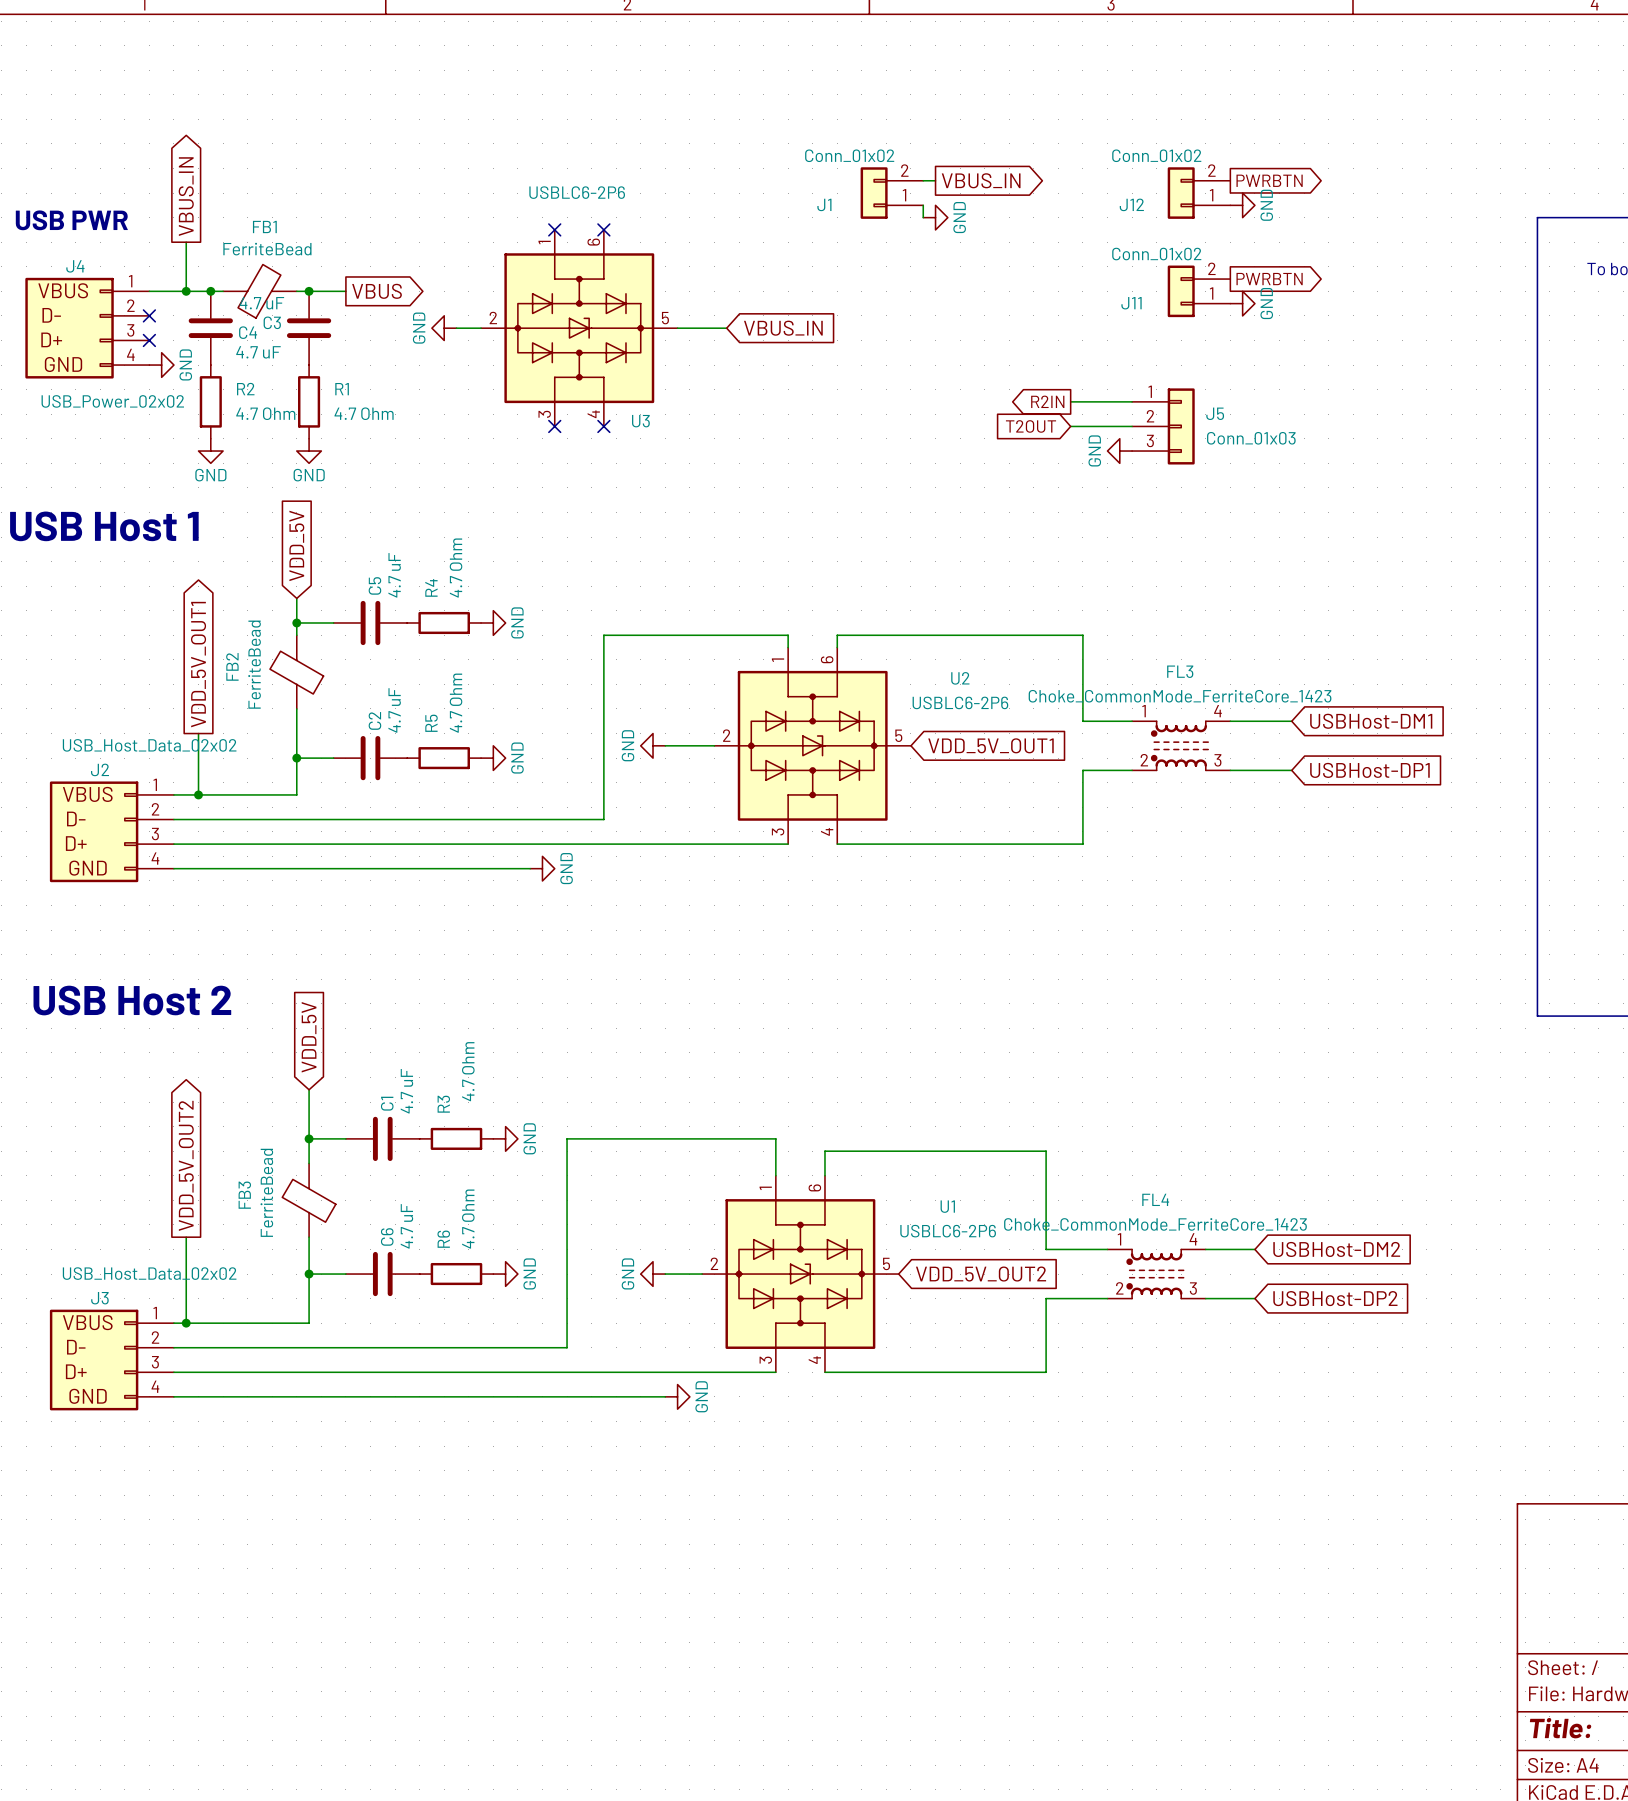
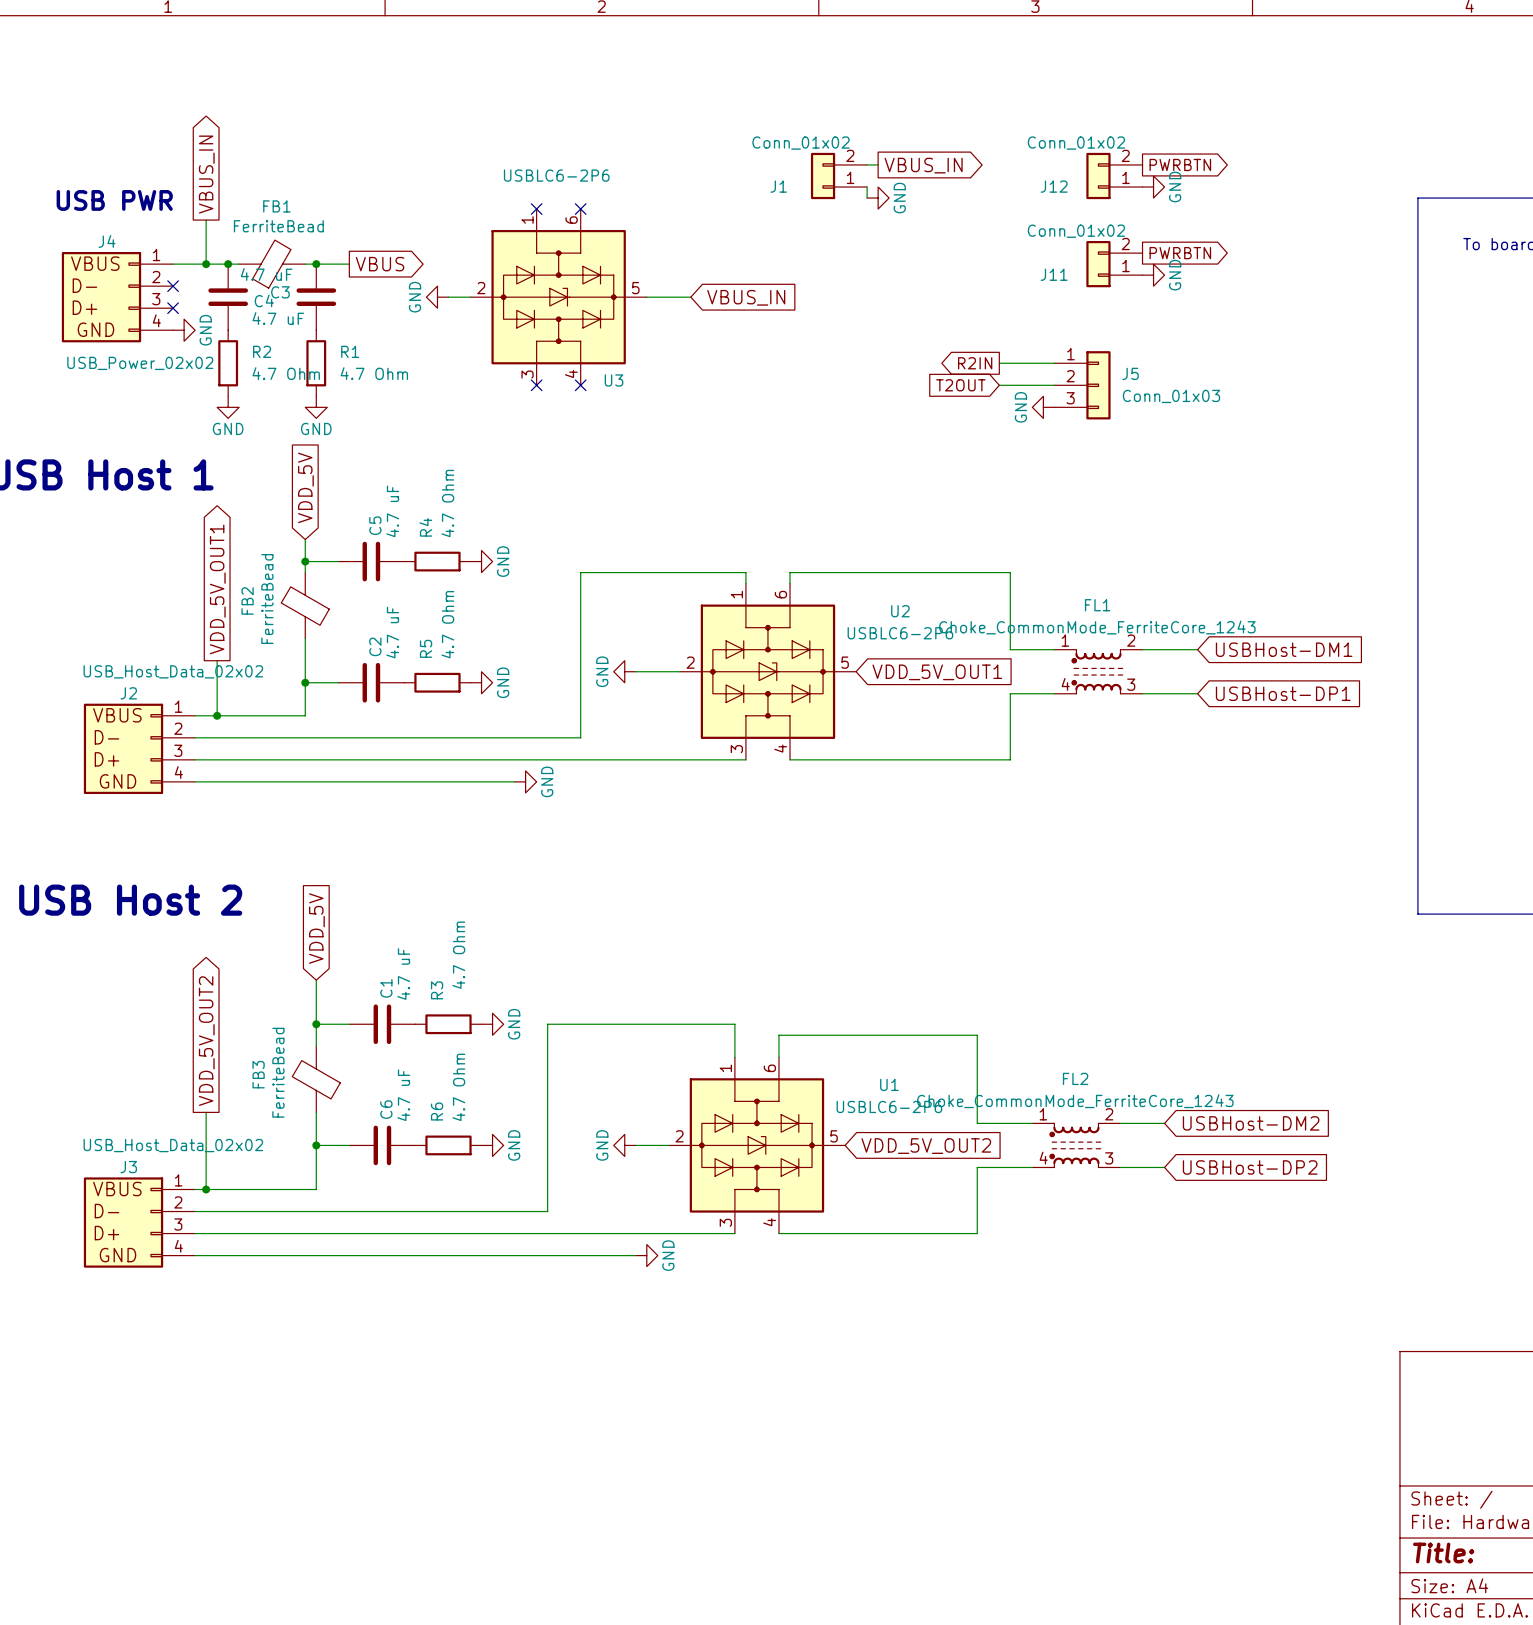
FL3 name: FL3 (1180, 671) -> FL1 (1097, 605)
FL3 value: Choke_CommonMode_FerriteCore_1423 (1180, 696) -> Choke_CommonMode_FerriteCore_1243 (1097, 627)
FL3 pin number: 4 (1217, 711) -> 2 (1131, 640)
FL3 pin number: 2 (1144, 760) -> 4 (1065, 684)
FL4 name: FL4 (1155, 1199) -> FL2 (1075, 1078)
FL4 value: Choke_CommonMode_FerriteCore_1423 (1155, 1224) -> Choke_CommonMode_FerriteCore_1243 (1075, 1101)
FL4 pin number: 4 (1193, 1239) -> 2 (1109, 1114)
FL4 pin number: 2 (1119, 1288) -> 4 (1043, 1158)

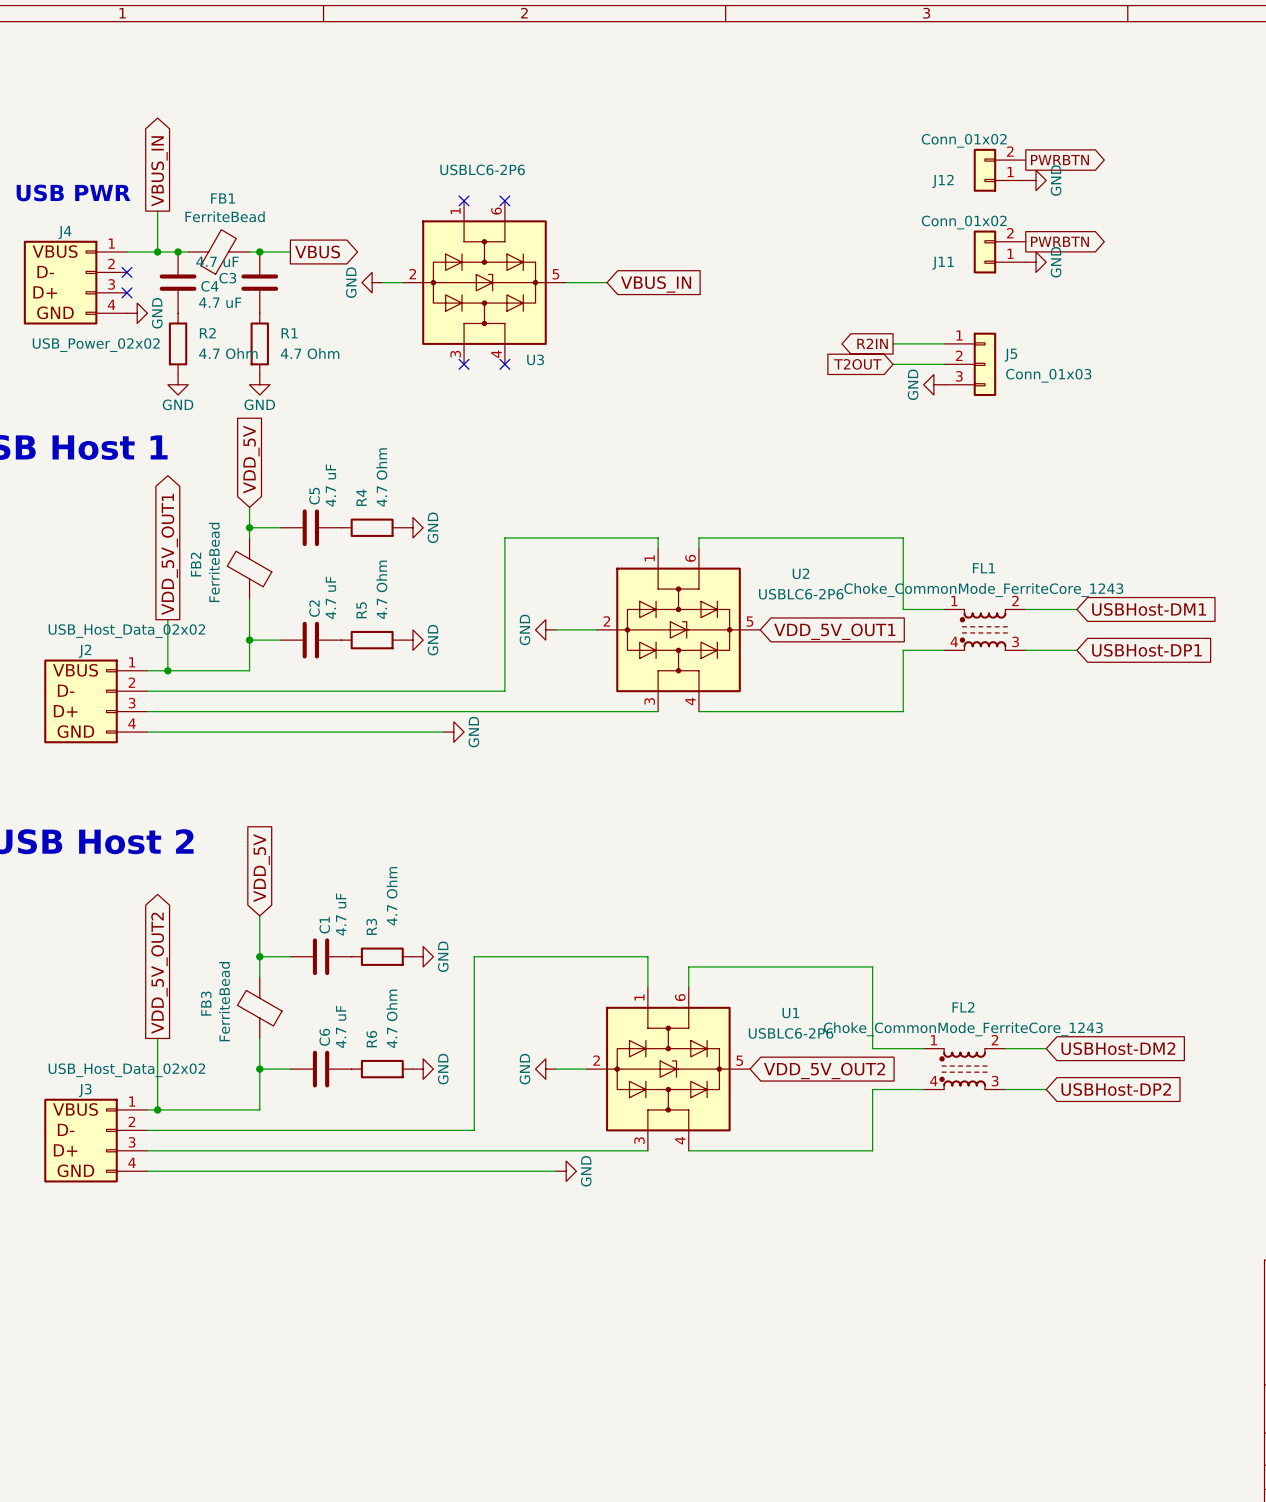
wire: (867, 164) (878, 164) -> none
global label: VBUS_IN (923, 165) -> none
J1: Conn_01x02 (839, 175) -> none
wire: (867, 187) (867, 198) -> none
power symbol: GND (878, 198) -> none

